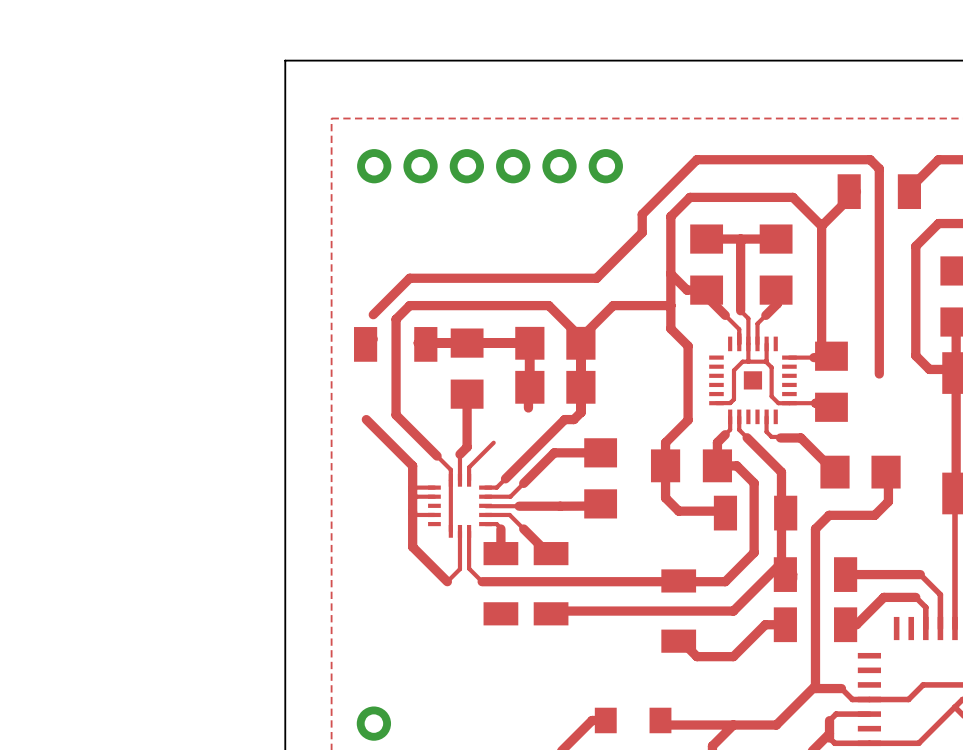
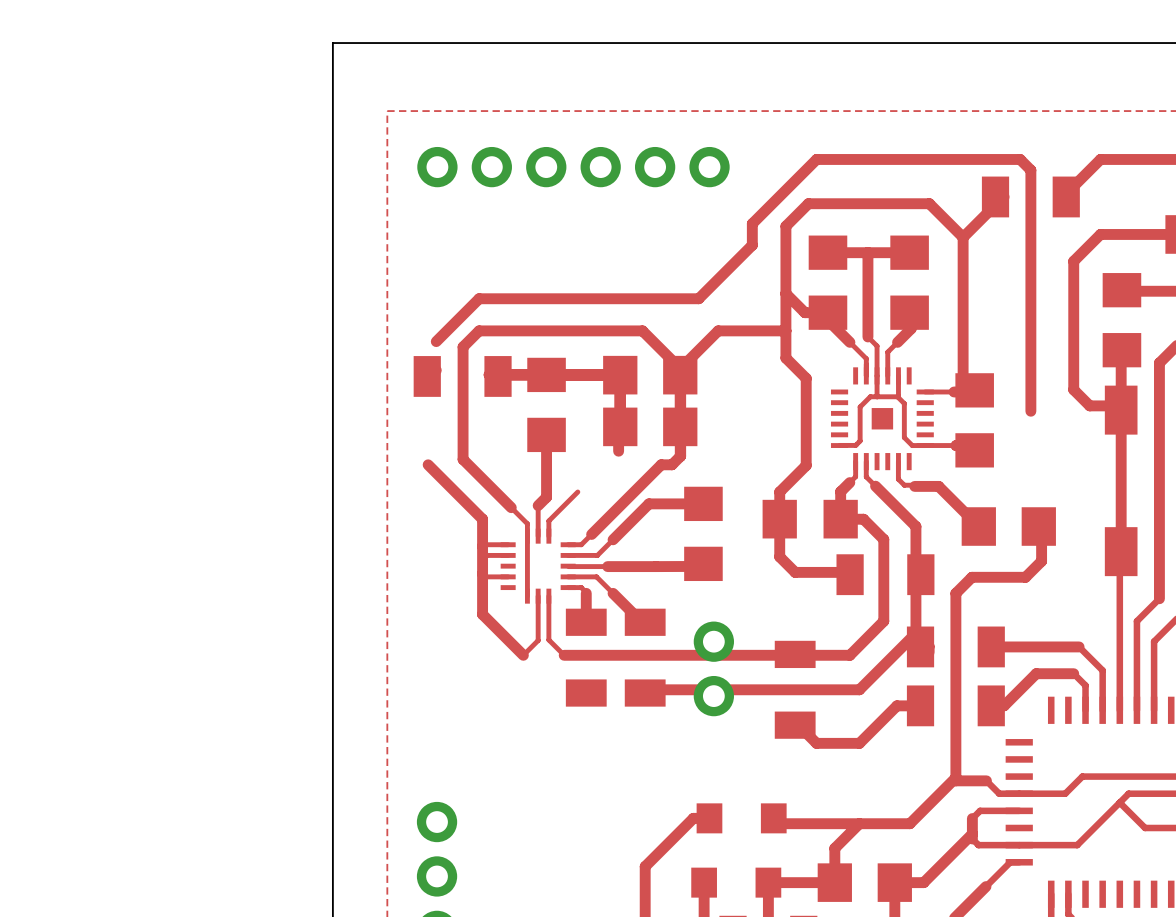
part: none -> (713, 641)
part: none -> (713, 696)

